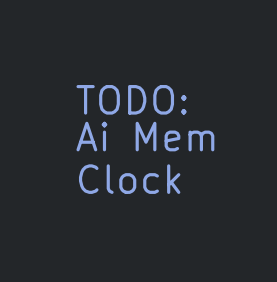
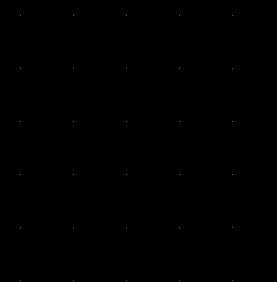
text: TODO: (131, 99) -> none
text: Ai Mem (145, 136) -> none
text: Clock (129, 179) -> none

